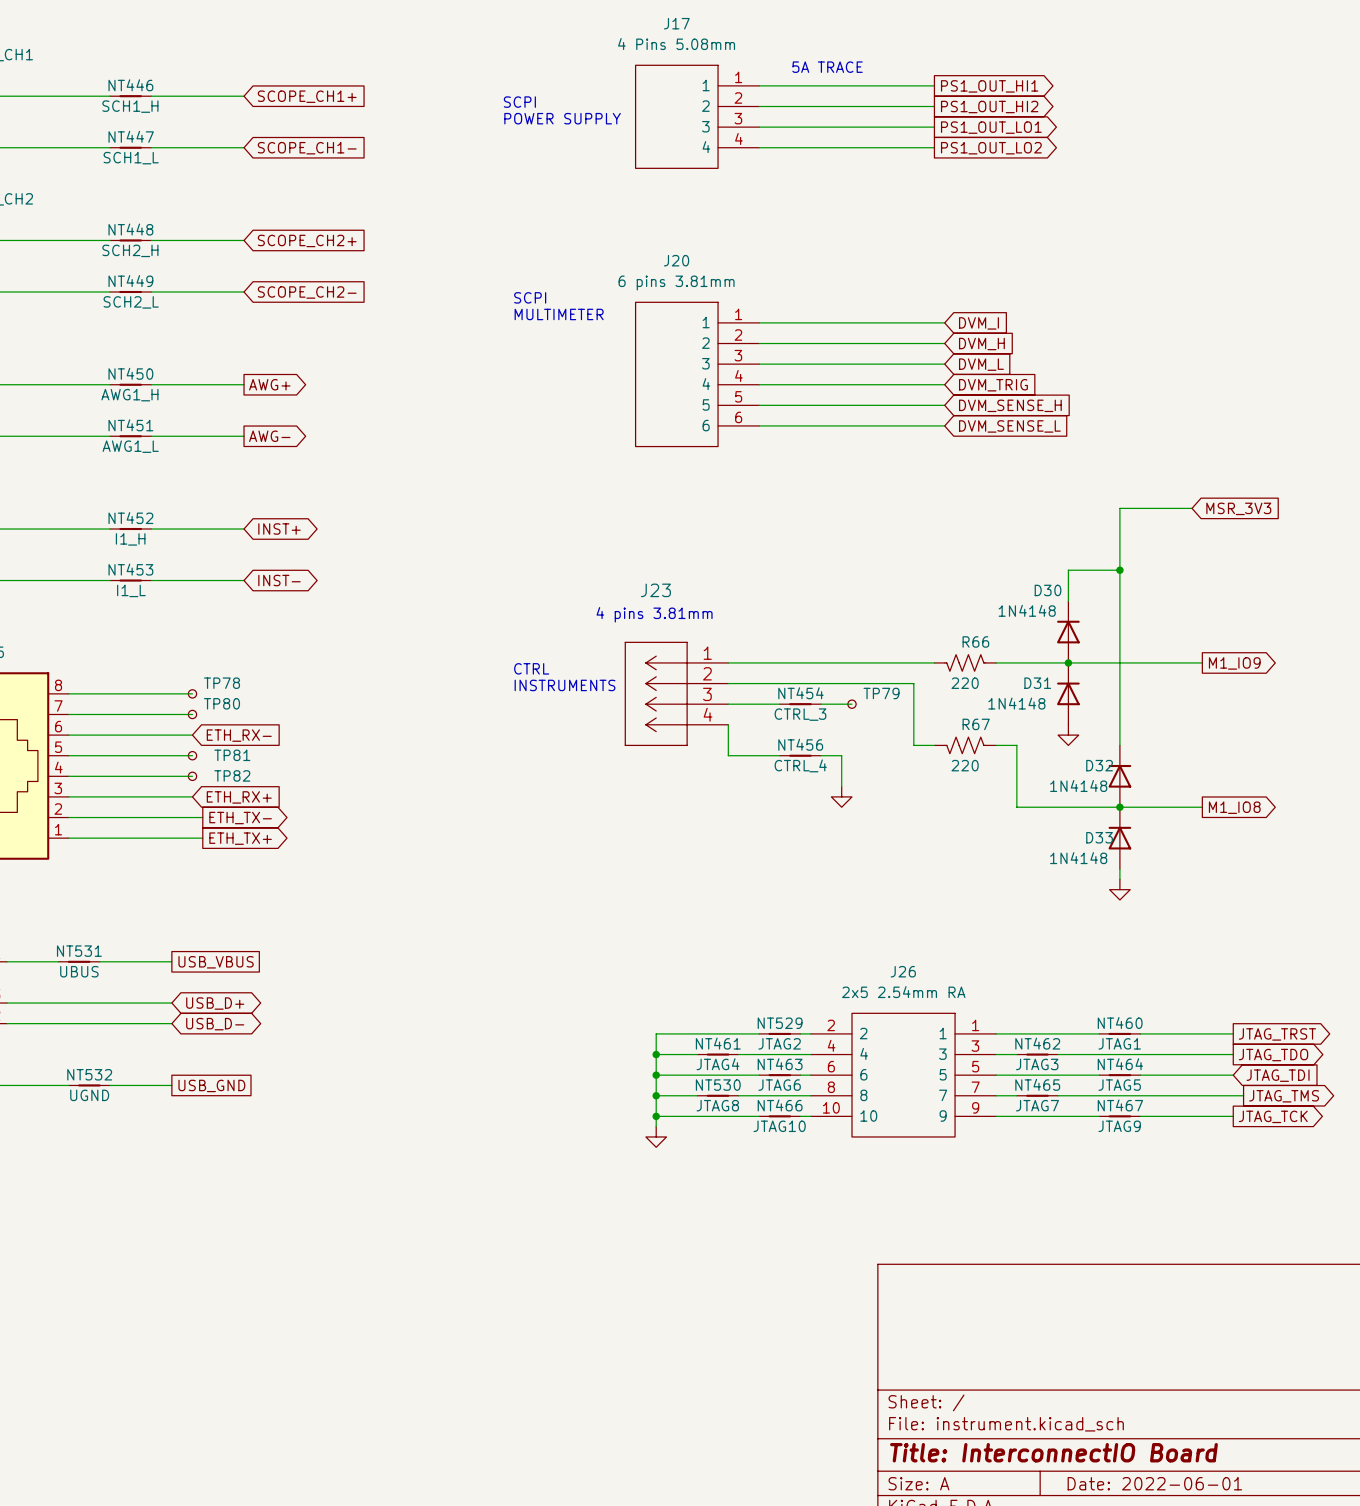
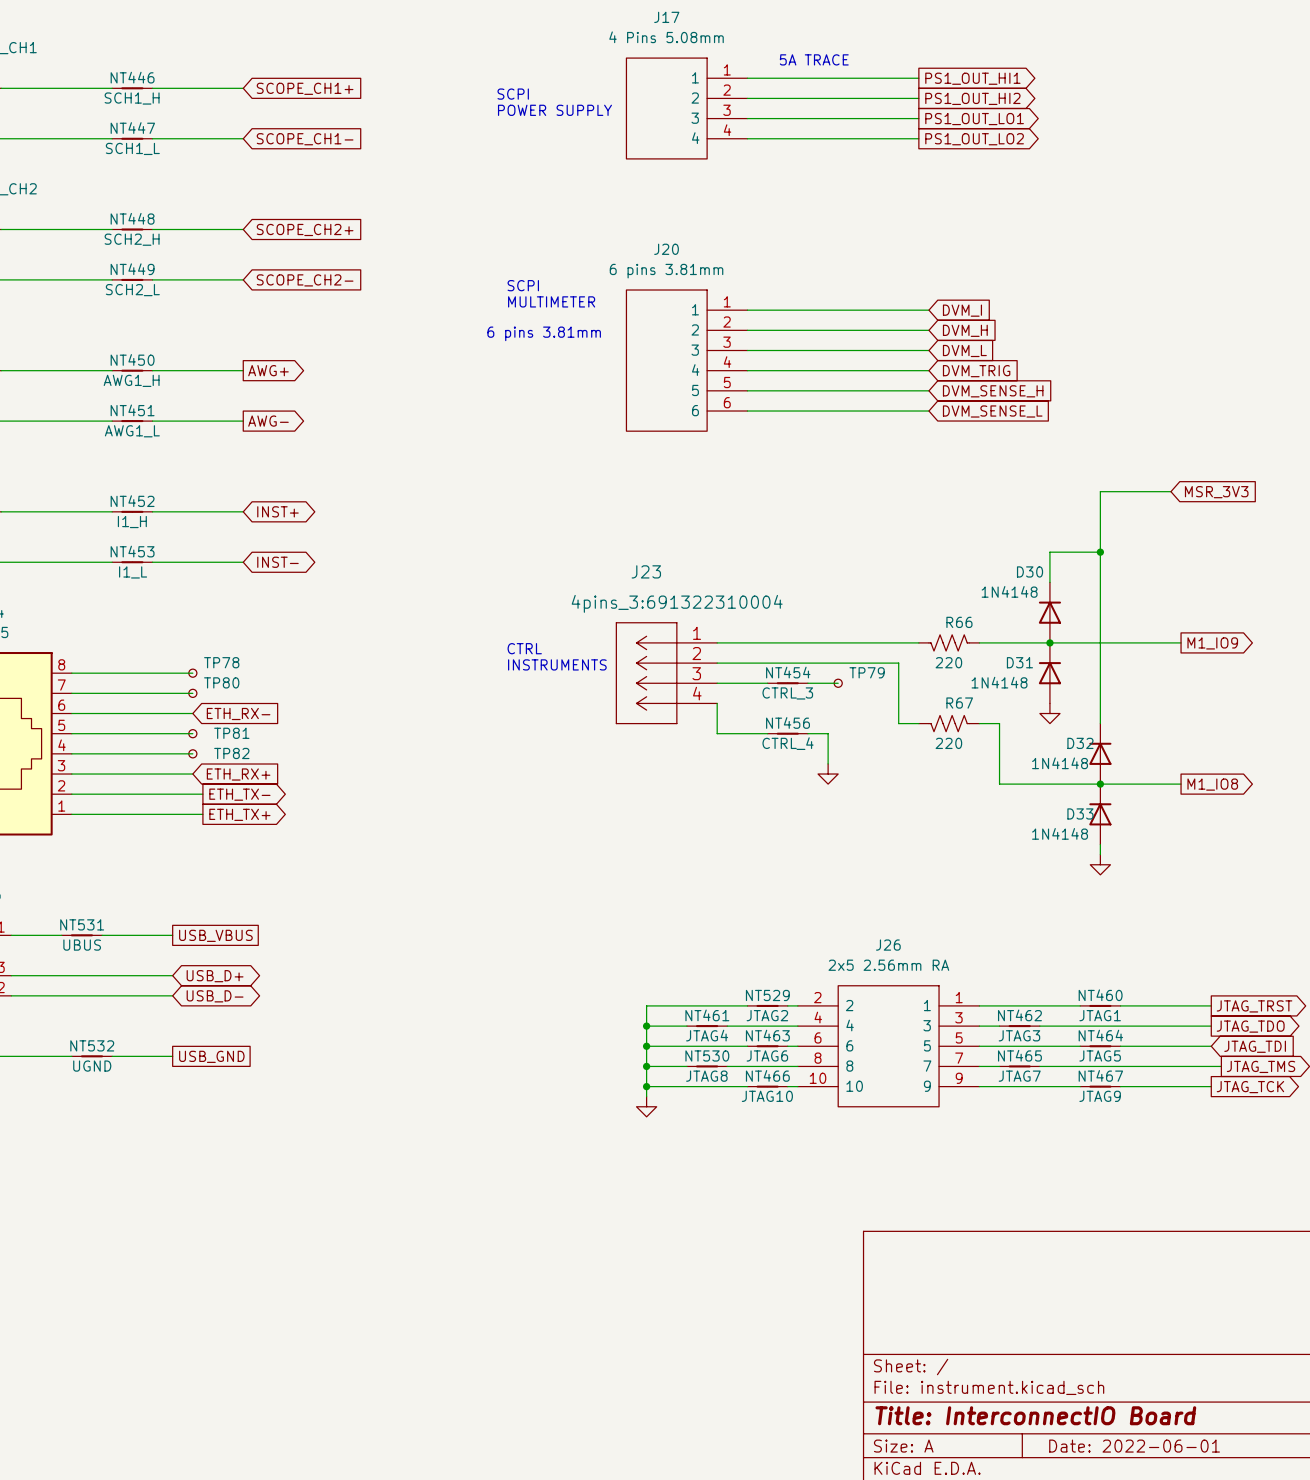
text: none -> 6 pins 3.81mm (544, 333)
text: 4 pins 3.81mm (654, 614) -> none
J23 text: none -> 4pins_3:691322310004 (677, 603)
J26 value: 2x5 2.54mm RA (903, 992) -> 2x5 2.56mm RA (888, 965)

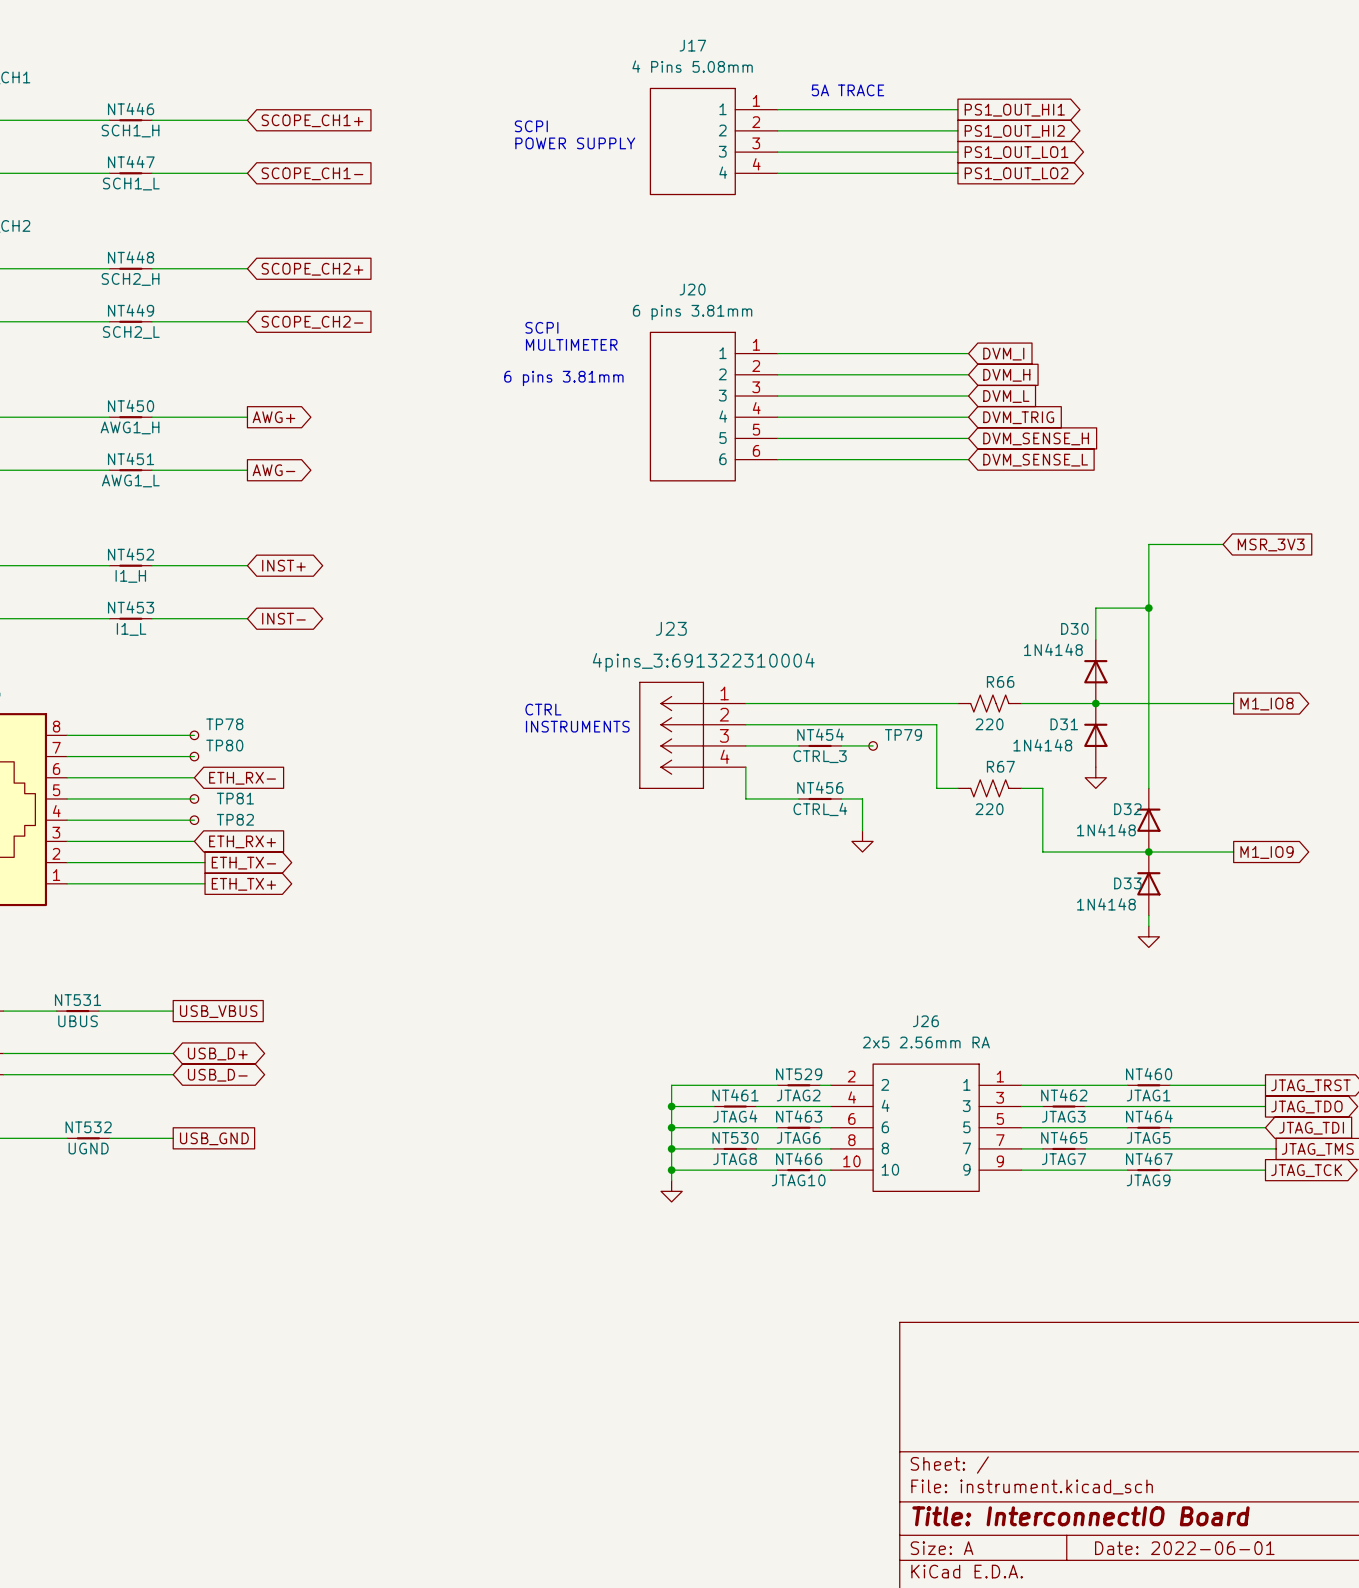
global label: M1_IO9 (1212, 643) -> M1_IO8 (1267, 704)
global label: M1_IO8 (1212, 784) -> M1_IO9 (1267, 852)

